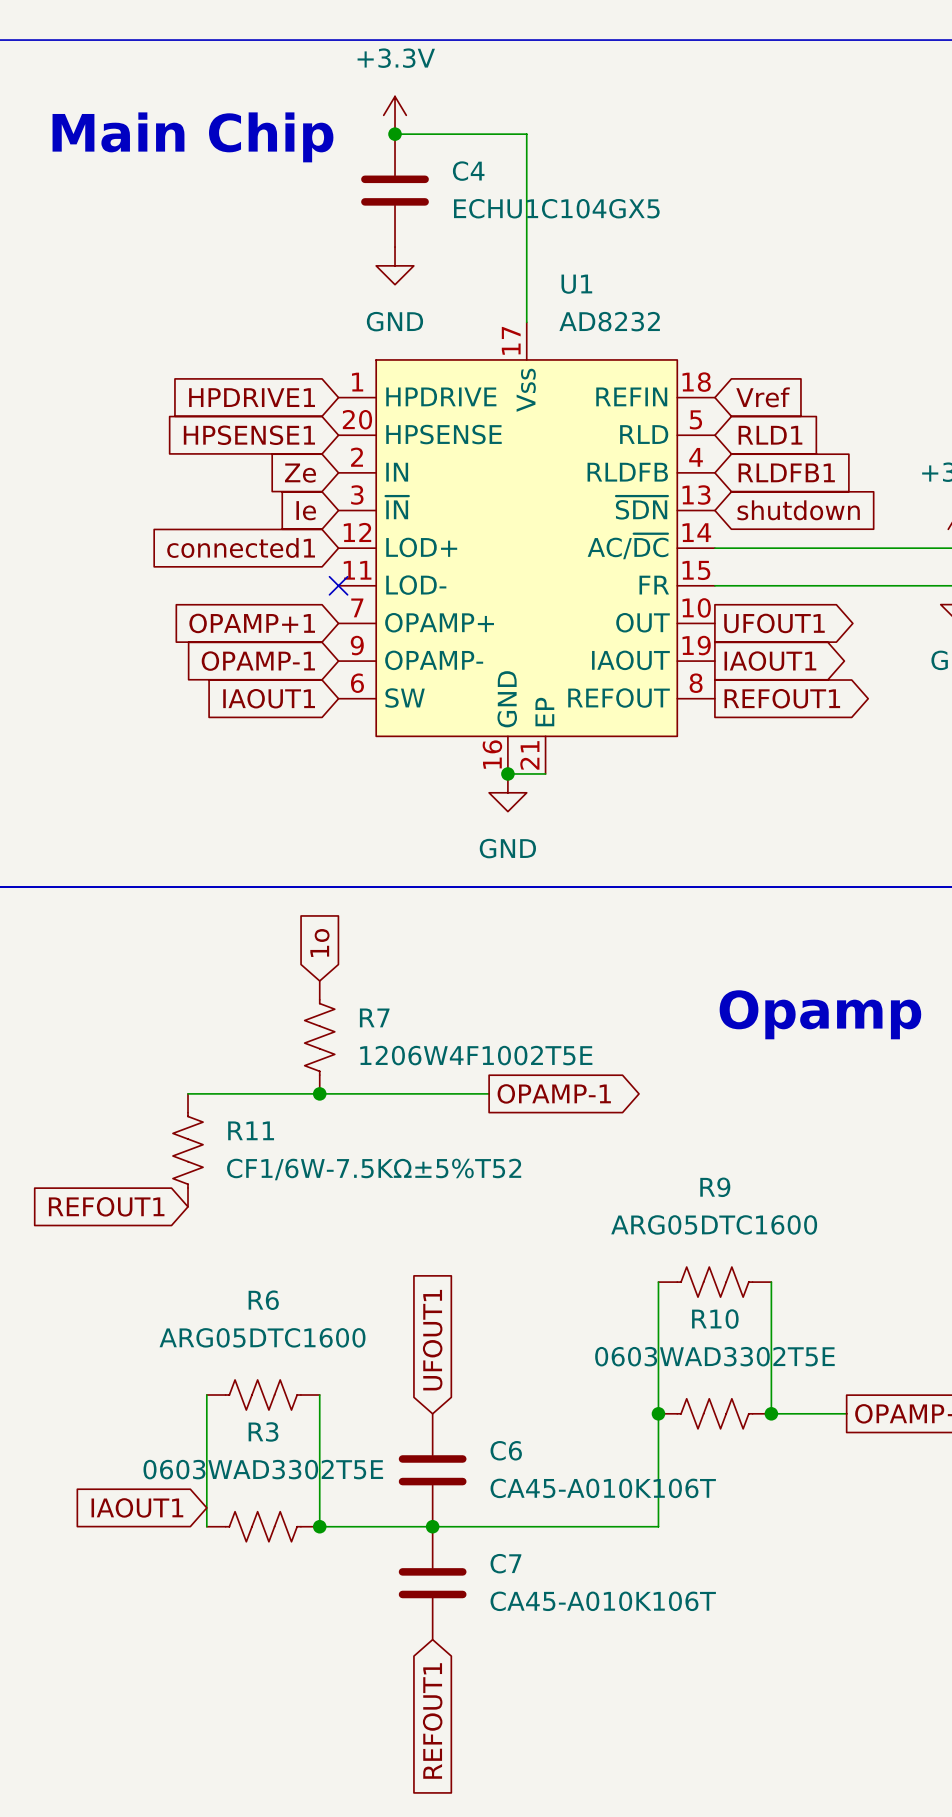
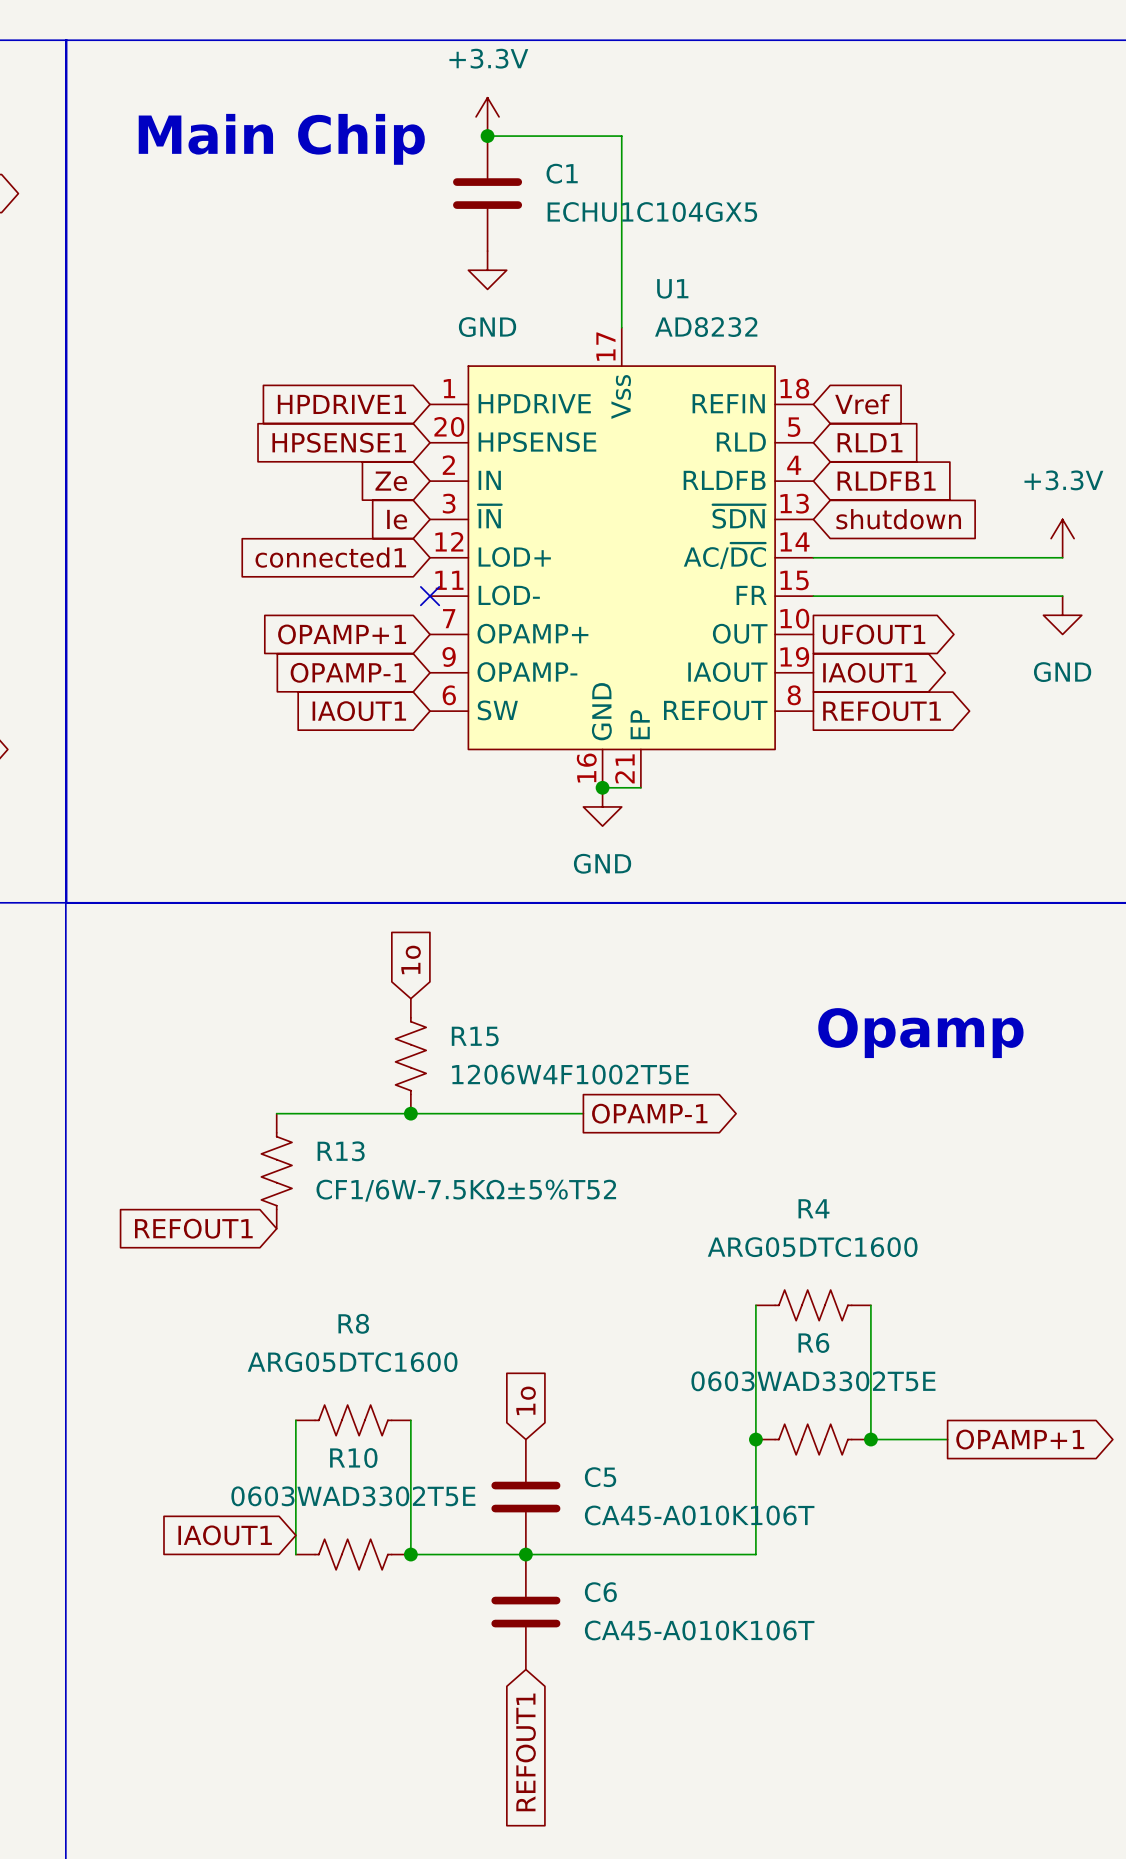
C4 name: C4 (468, 171) -> C1 (562, 173)
R7 name: R7 (374, 1017) -> R15 (475, 1036)
R11 name: R11 (251, 1130) -> R13 (341, 1151)
R9 name: R9 (715, 1187) -> R4 (813, 1208)
R6 name: R6 (263, 1300) -> R8 (353, 1323)
R10 name: R10 (715, 1319) -> R6 (813, 1342)
global label: UFOUT1 (432, 1340) -> 1o (526, 1400)
R3 name: R3 (263, 1431) -> R10 (353, 1458)
C6 name: C6 (506, 1450) -> C5 (600, 1477)
C7 name: C7 (505, 1563) -> C6 (600, 1592)

